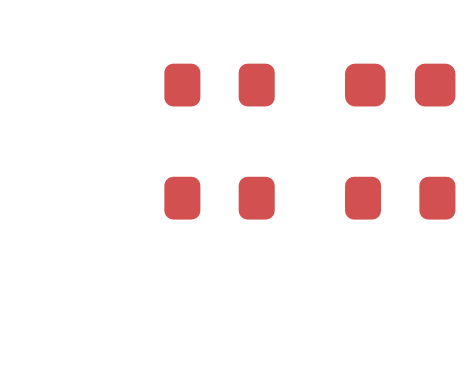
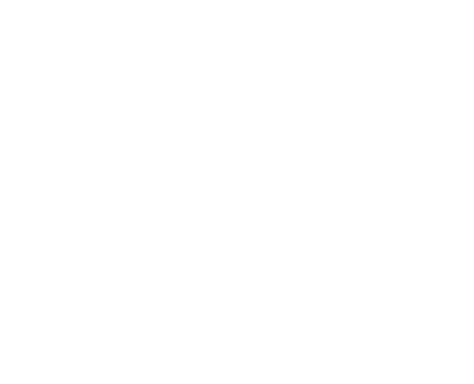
part: (219, 85) -> none
part: (400, 85) -> none
part: (219, 198) -> none
part: (400, 198) -> none

